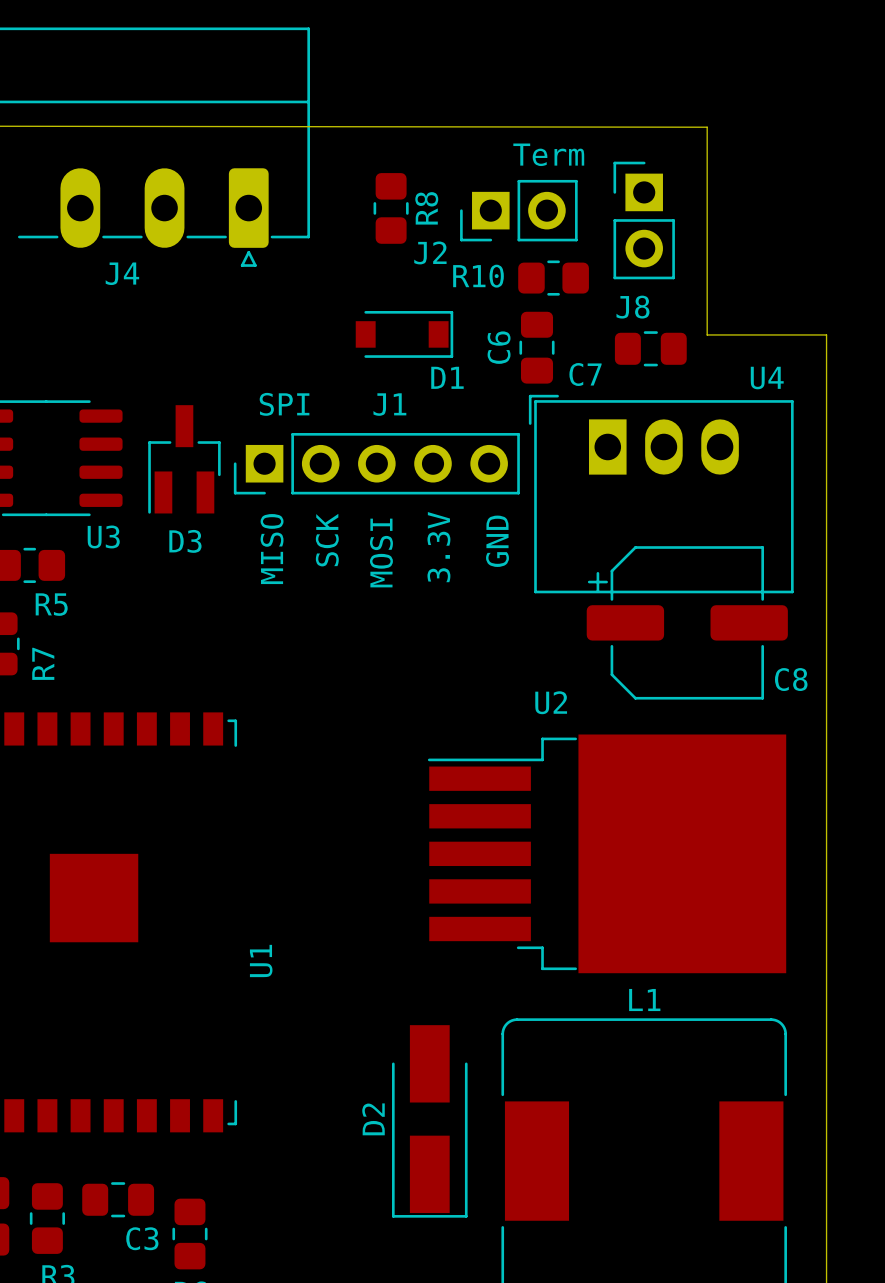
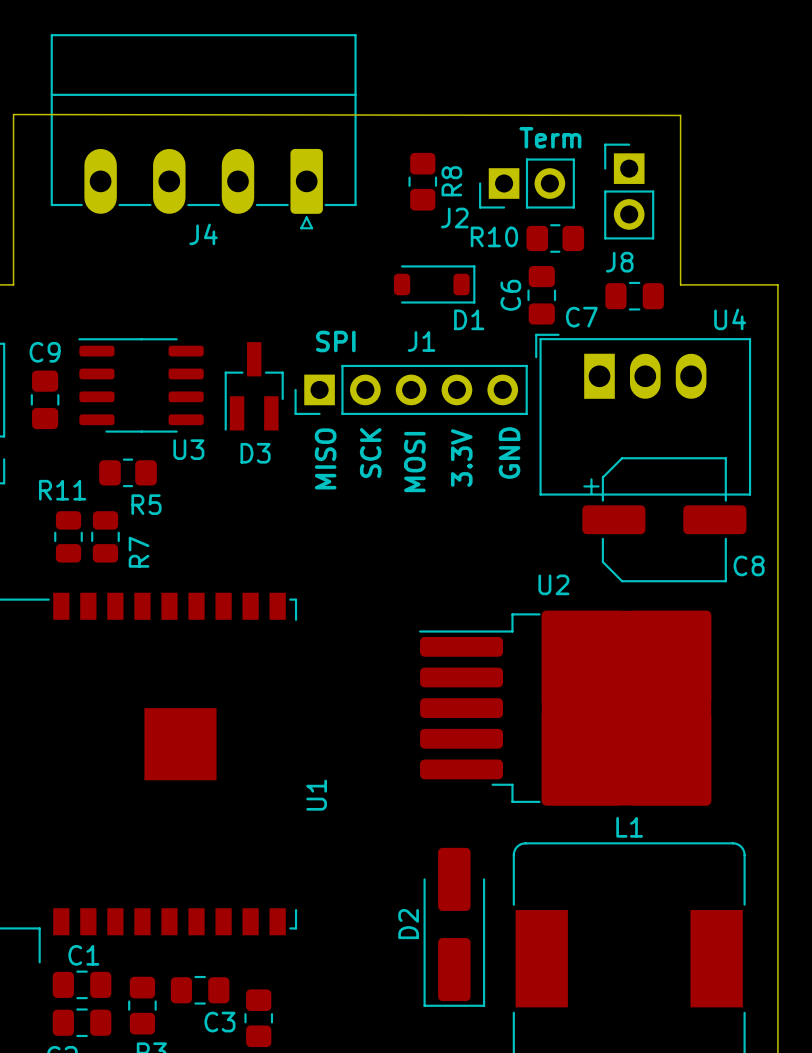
D1 footprint: [355, 311, 454, 358] -> [393, 265, 476, 304]
U2 footprint: [427, 734, 787, 974] -> [418, 610, 712, 806]
D2 footprint: [392, 1025, 468, 1218] -> [423, 847, 486, 1007]

